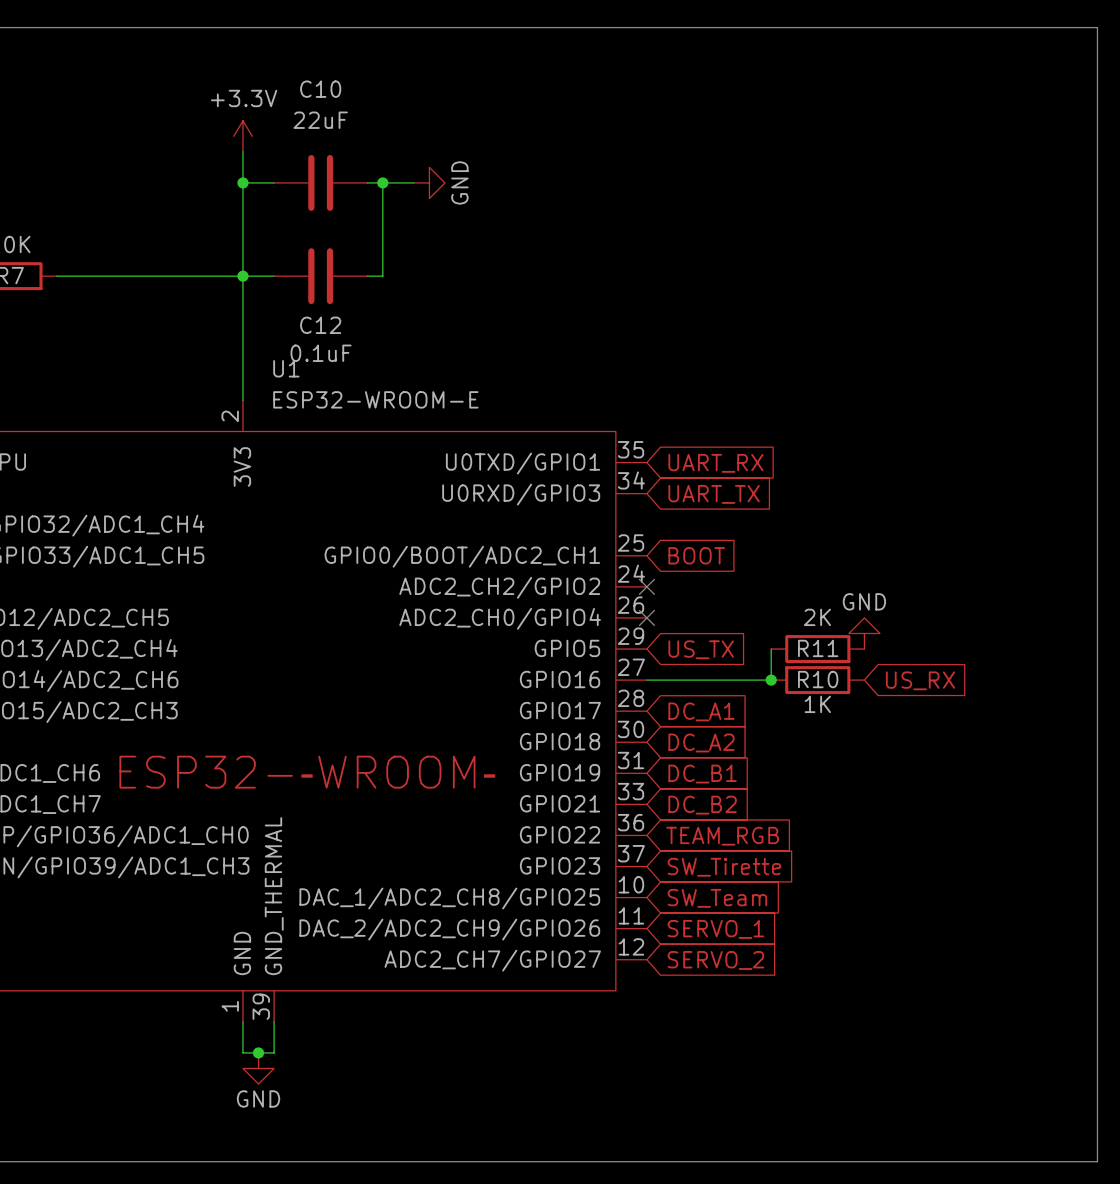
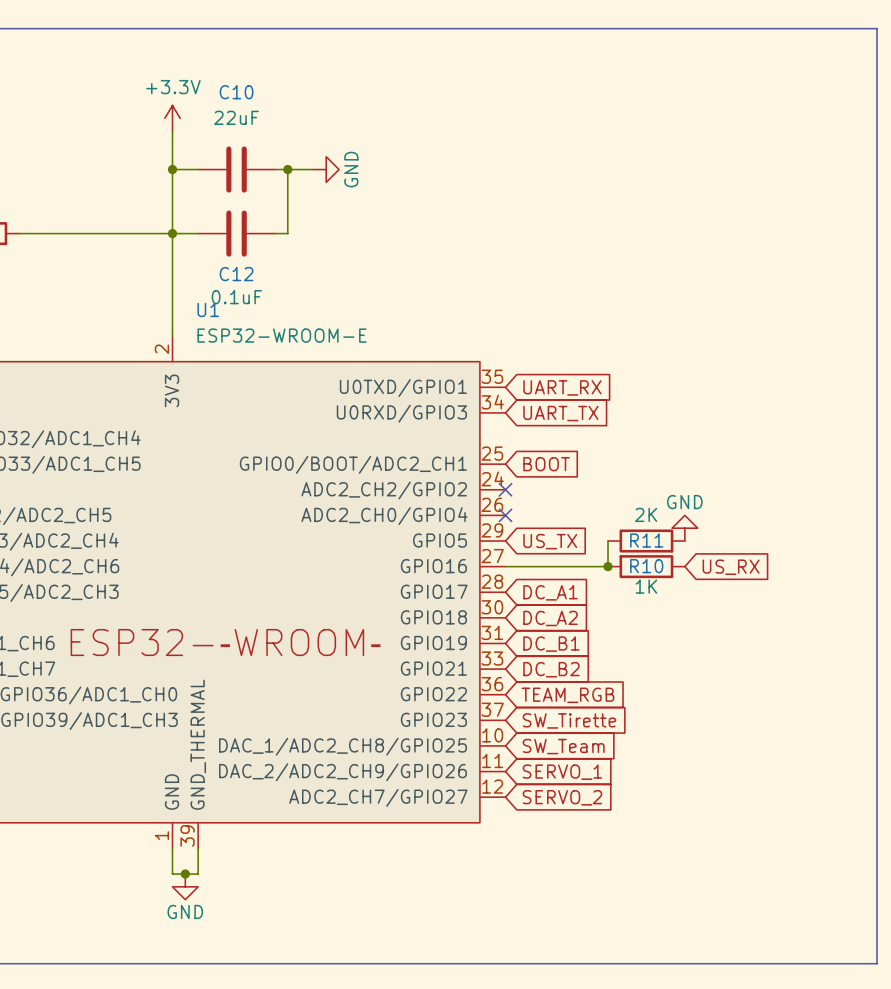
wire: (242, 182) (274, 182) -> (172, 169) (198, 169)
junction position: (242, 182) -> (172, 169)
C10 position: (320, 182) -> (236, 169)
wire: (367, 182) (413, 182) -> (274, 169) (313, 169)
wire: (382, 182) (382, 198) -> none
junction position: (382, 182) -> (287, 169)
power symbol position: GND (429, 182) -> GND (326, 169)

